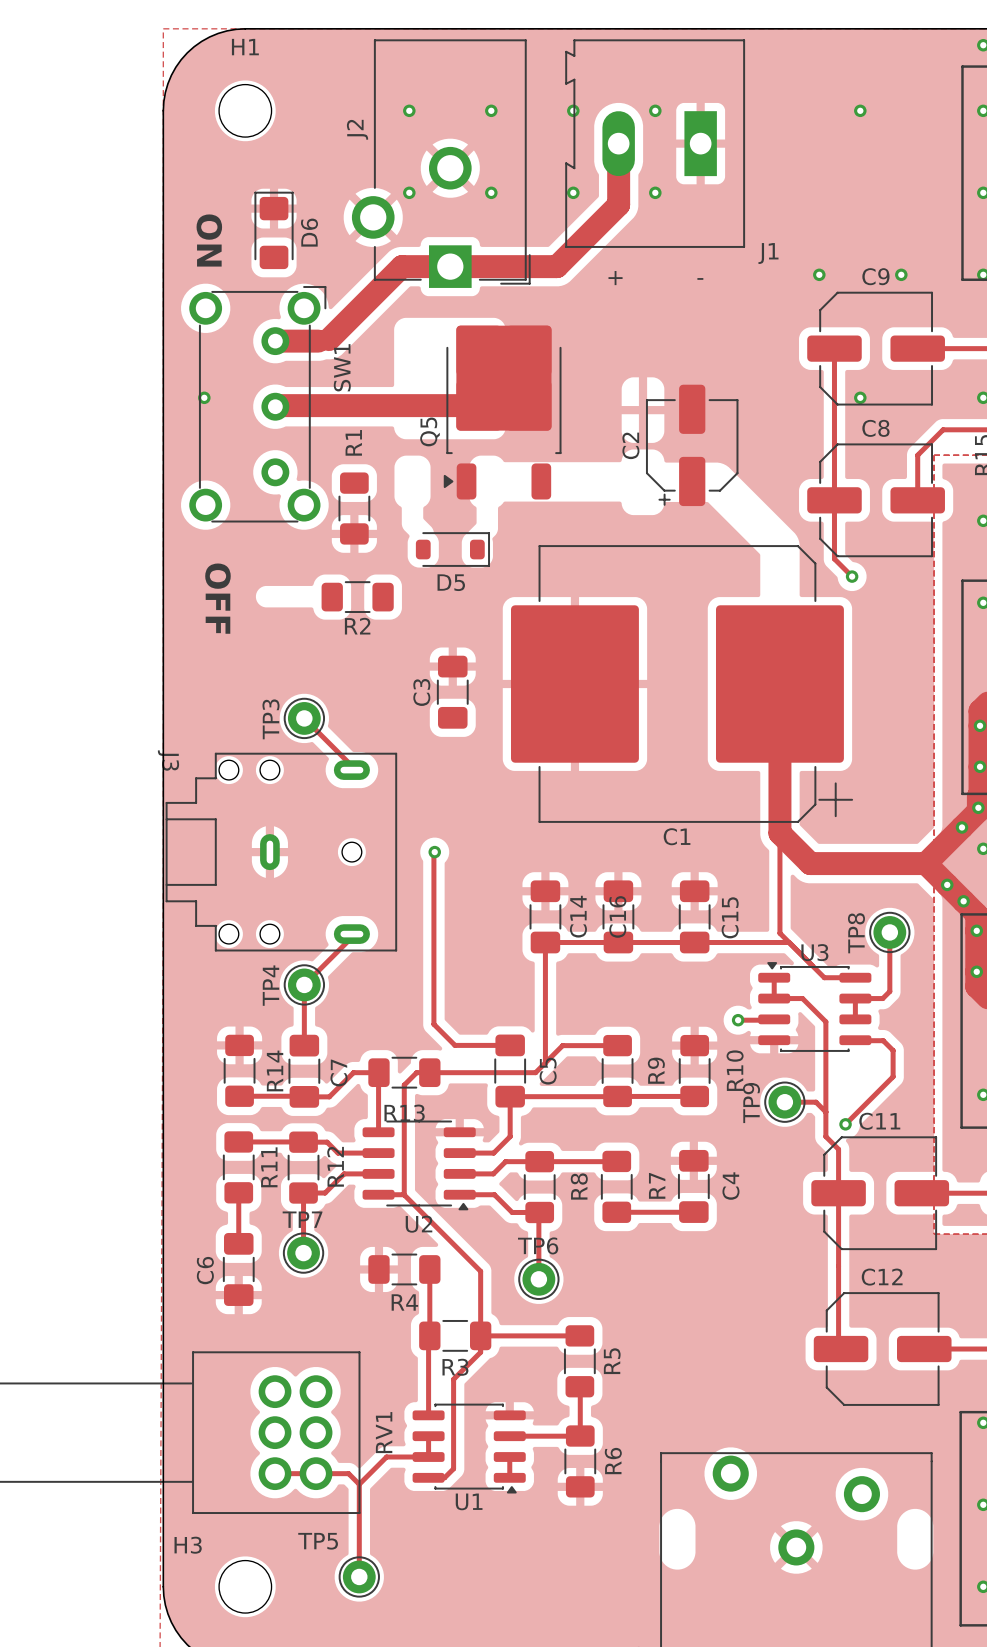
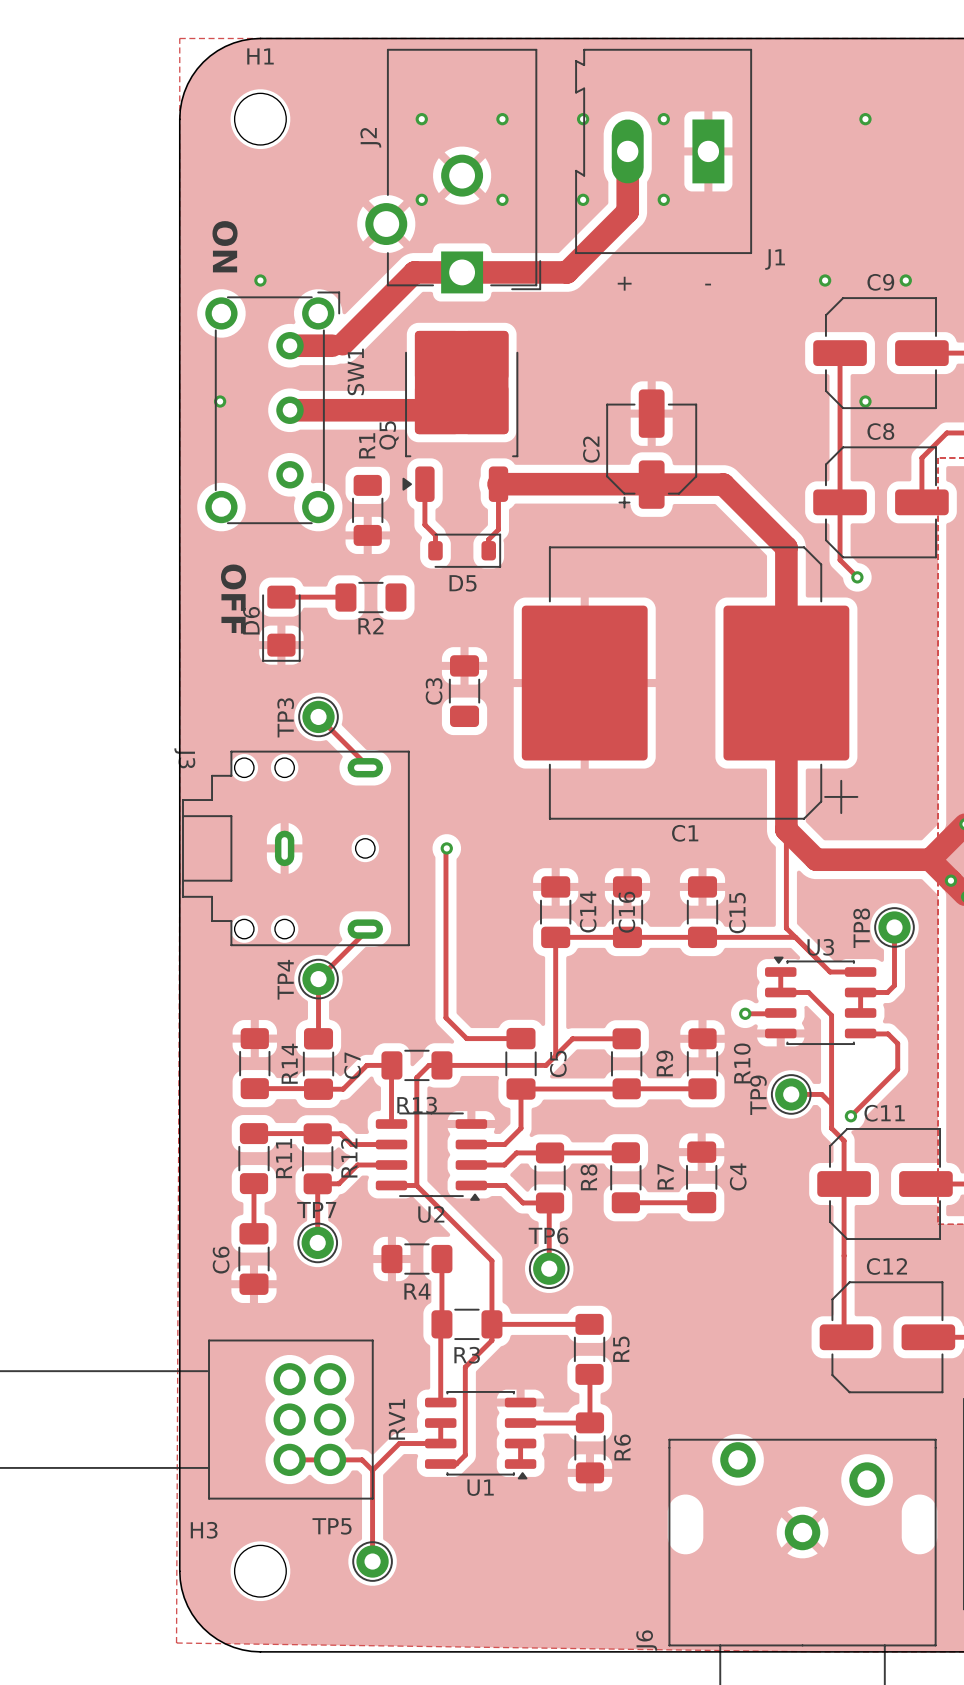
D6 rotation: 0° (274, 230) -> 180° (281, 623)
D6 position: (274, 230) -> (281, 623)
via: none -> (260, 280)
track: (478, 405) (275, 406) -> (437, 409) (290, 410)
Q5 position: (502, 412) -> (460, 416)
C2 position: (692, 445) -> (651, 449)
track: none -> (424, 484) (424, 524) (435, 535) (435, 550)
track: none -> (488, 550) (488, 539) (498, 529) (498, 484) (723, 484) (786, 547) (786, 683)
track: none -> (281, 597) (345, 597)

